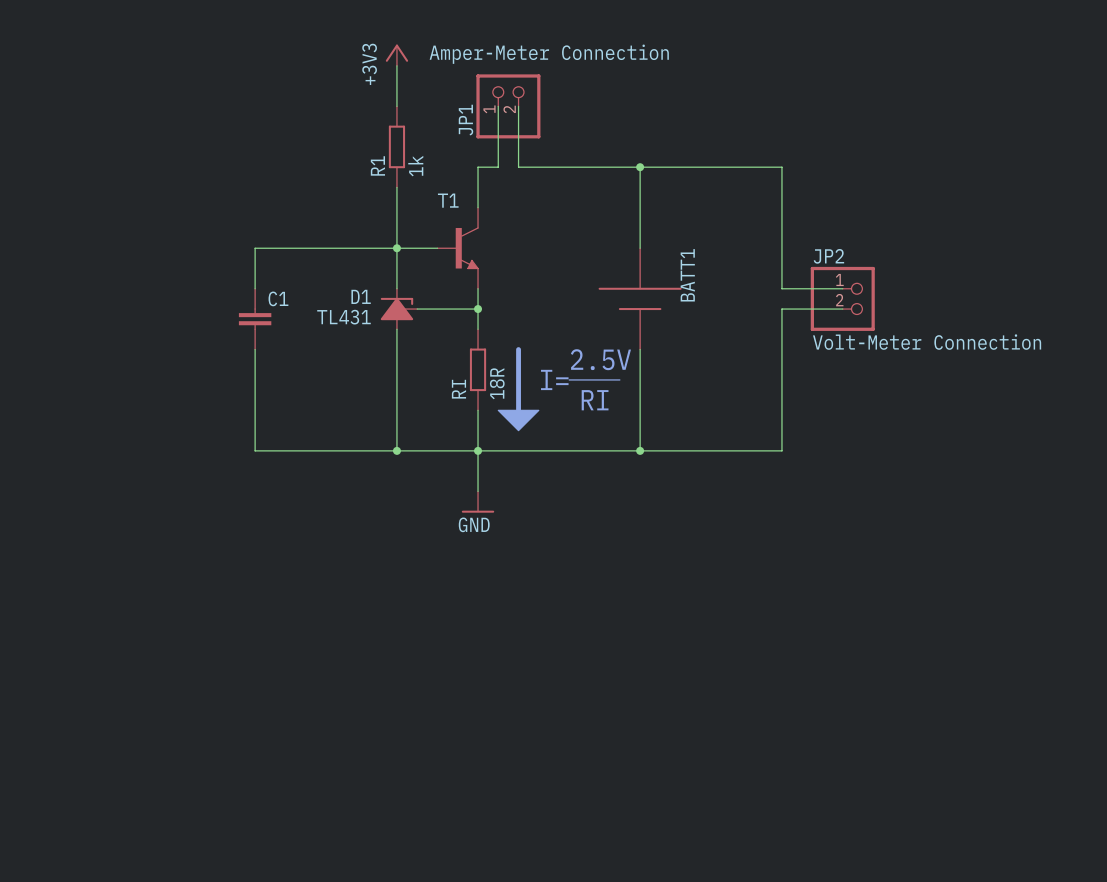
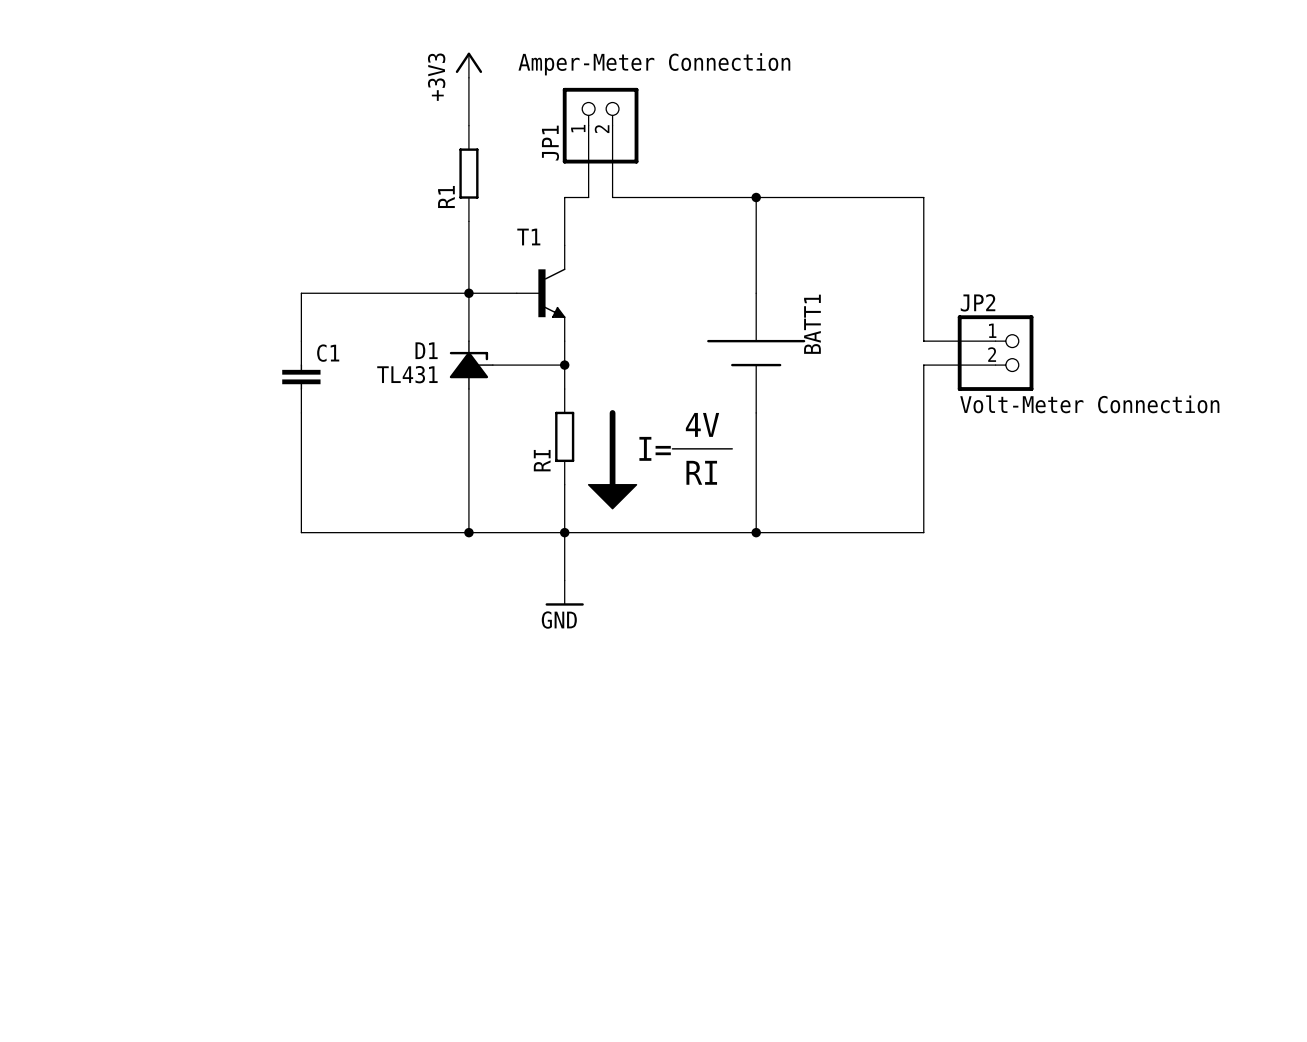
R1 value: 1k (415, 166) -> none
text: none -> 4V (702, 424)
text: 2.5V (600, 359) -> none
RI value: 18R (497, 383) -> none

